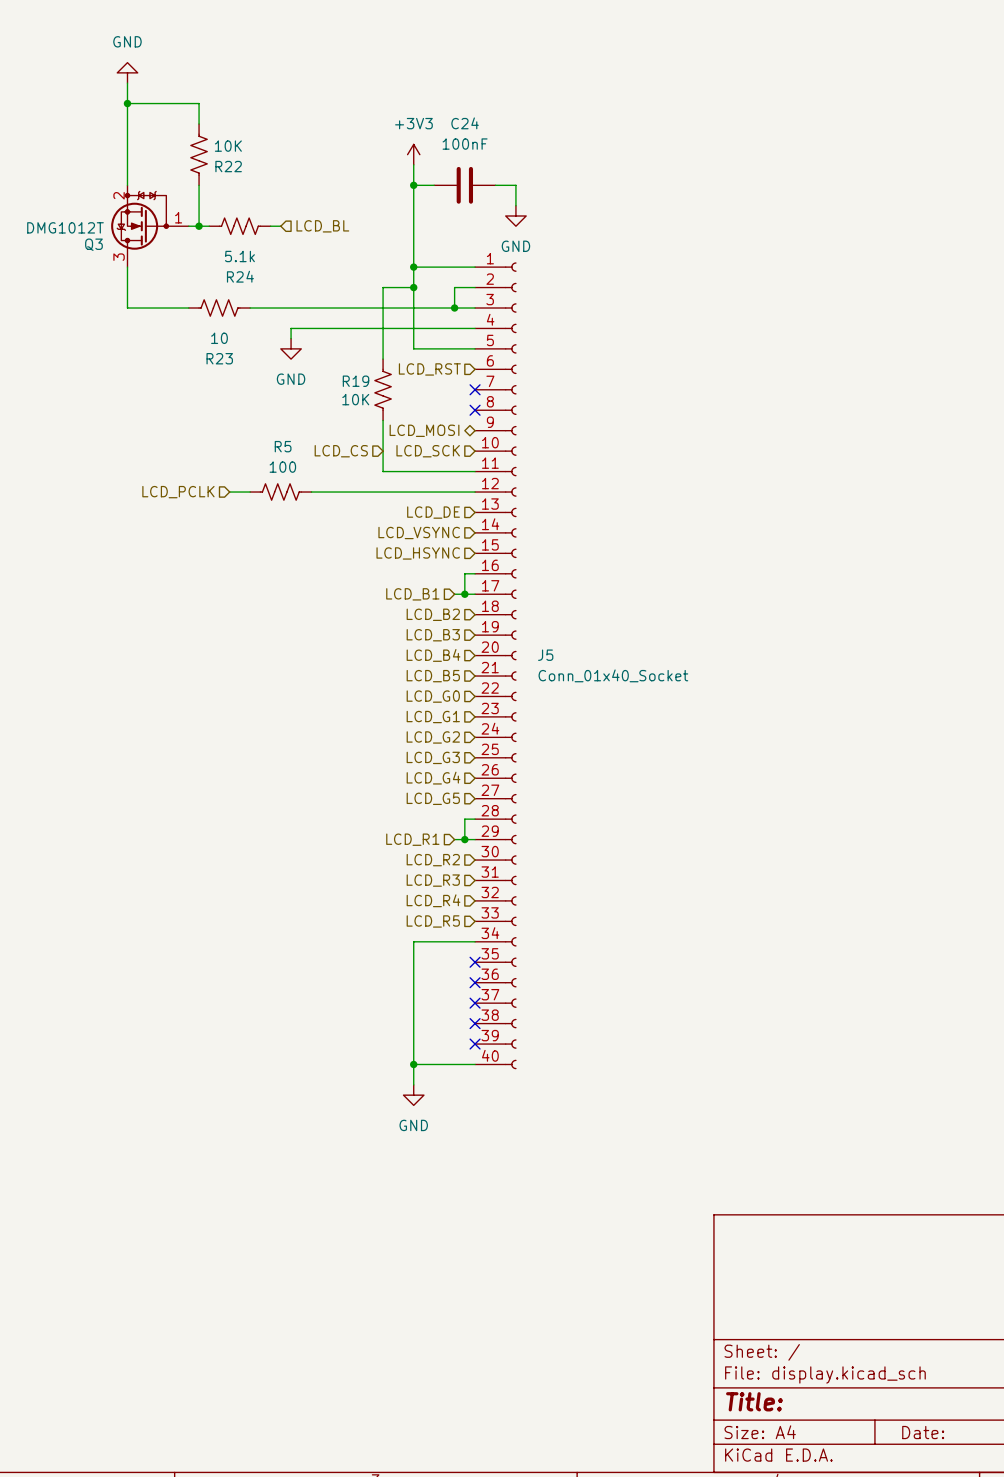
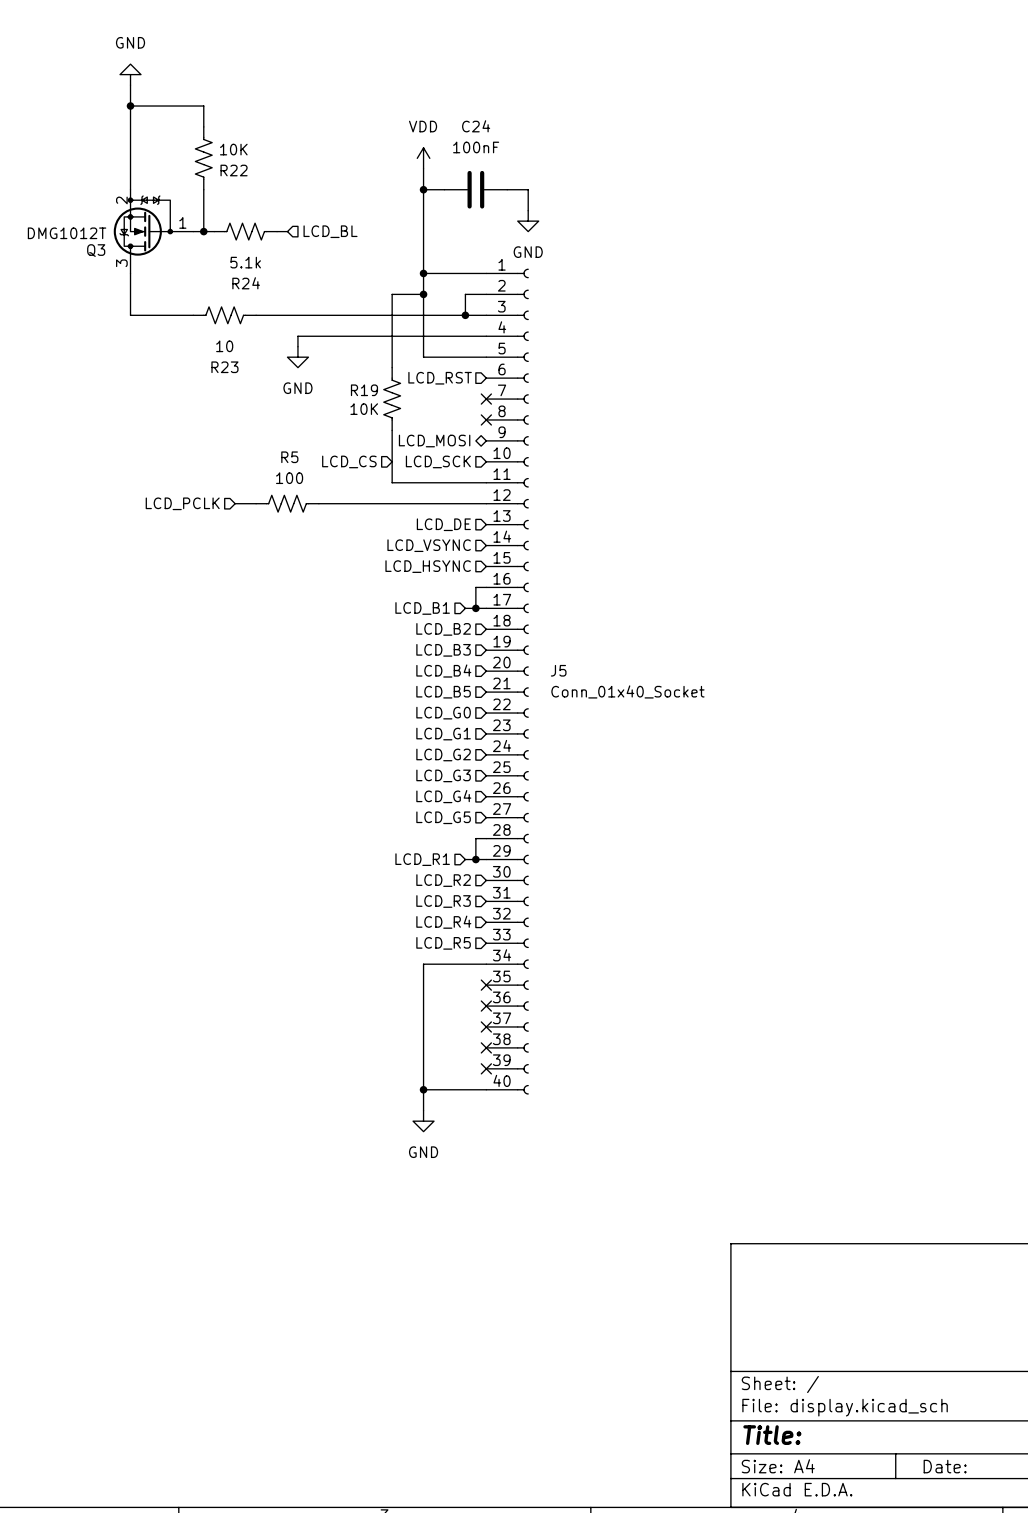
power symbol: +3V3 (413, 154) -> VDD (423, 158)

